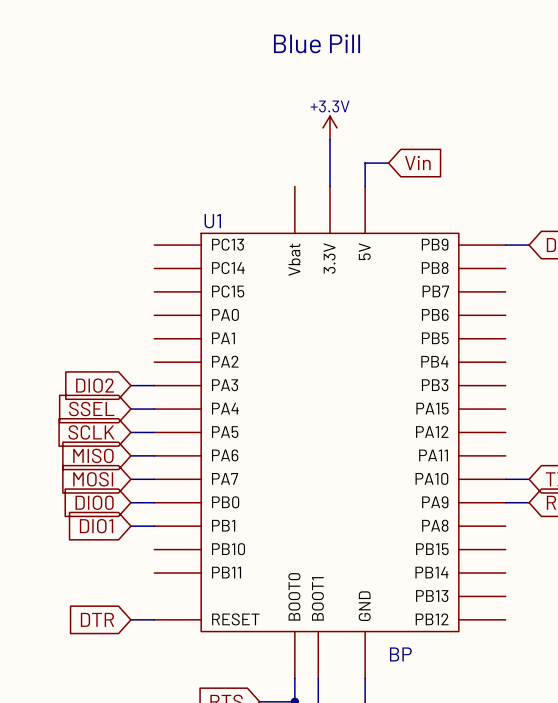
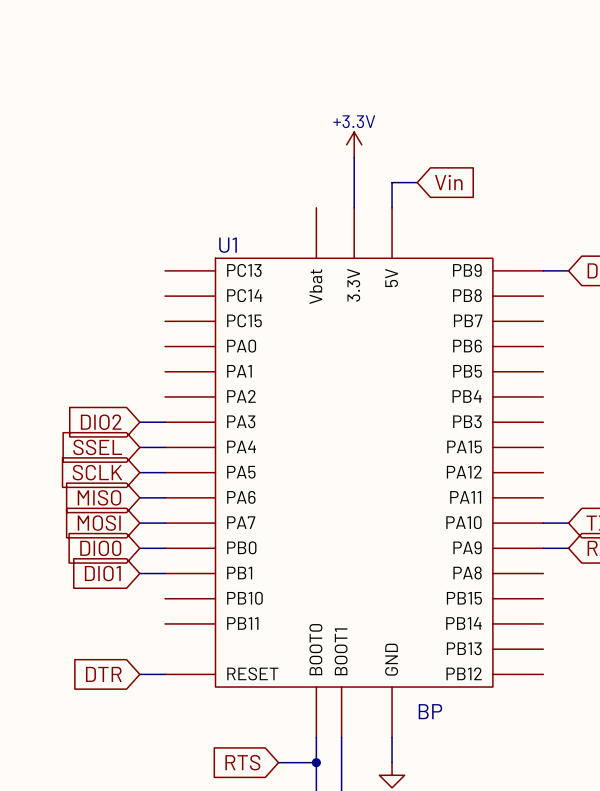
text: Blue Pill (317, 43) -> none

